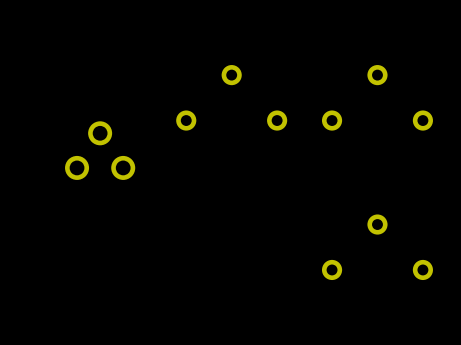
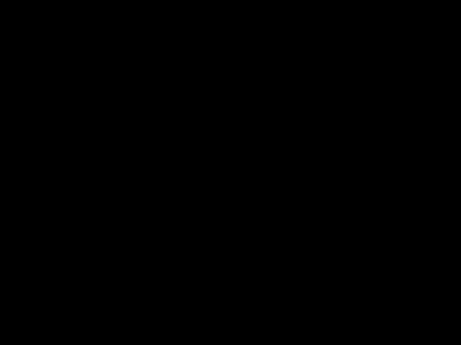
part: (231, 97) -> none
part: (377, 97) -> none
part: (100, 150) -> none
part: (377, 247) -> none

